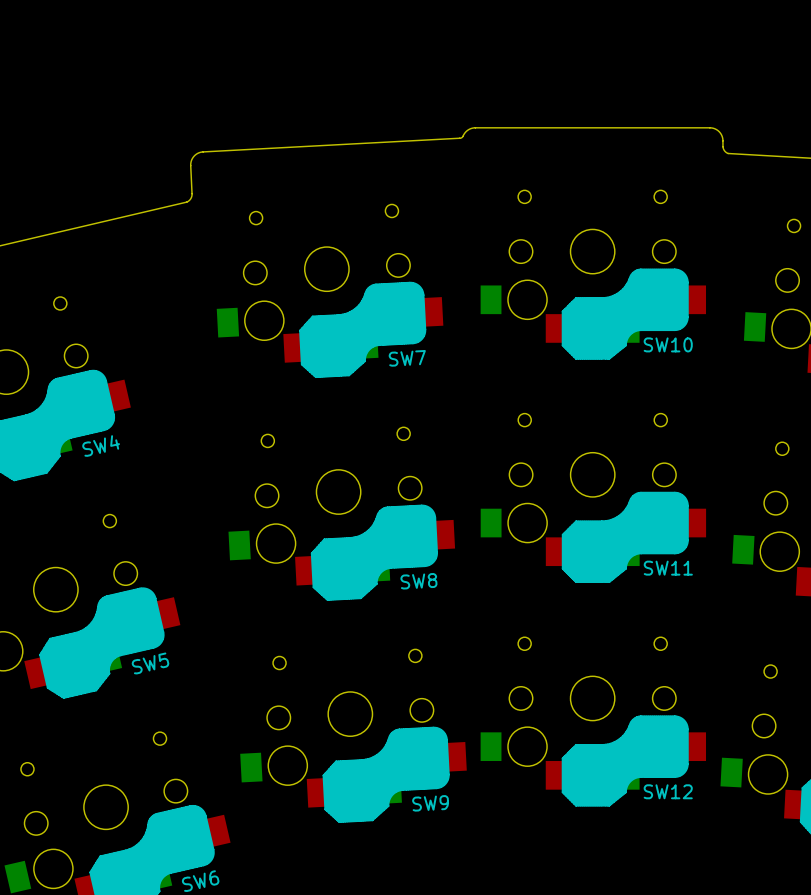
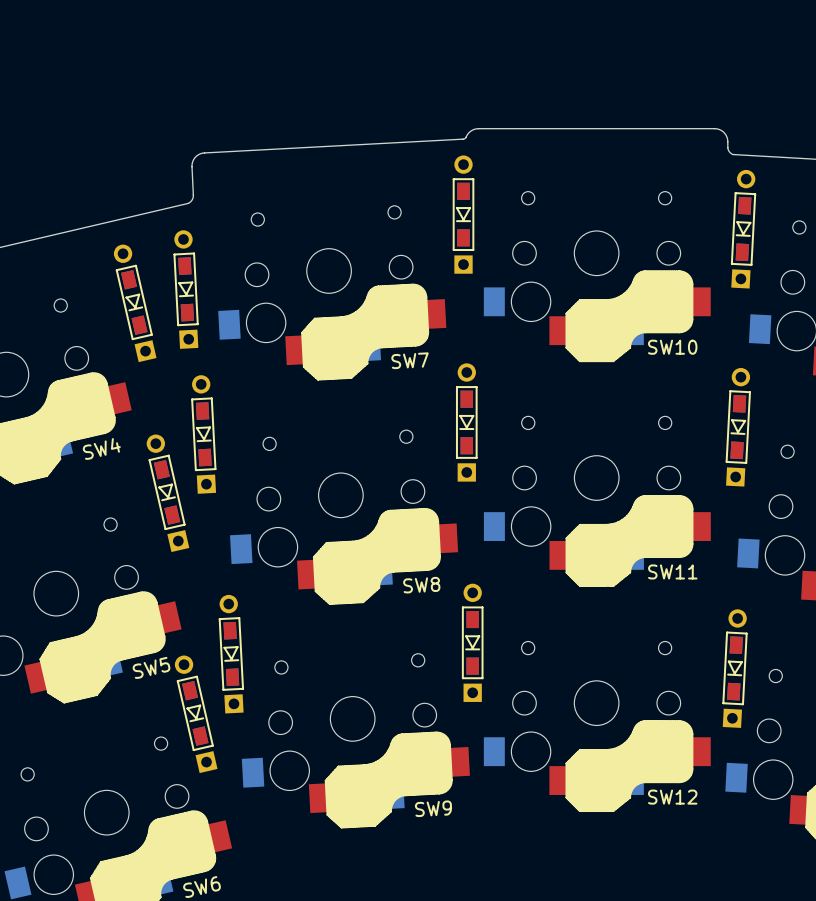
part: none -> (463, 214)
part: none -> (743, 229)
part: none -> (186, 289)
part: none -> (135, 303)
part: none -> (466, 422)
part: none -> (738, 427)
part: none -> (203, 434)
part: none -> (167, 493)
part: none -> (472, 642)
part: none -> (231, 654)
part: none -> (735, 668)
part: none -> (196, 714)

